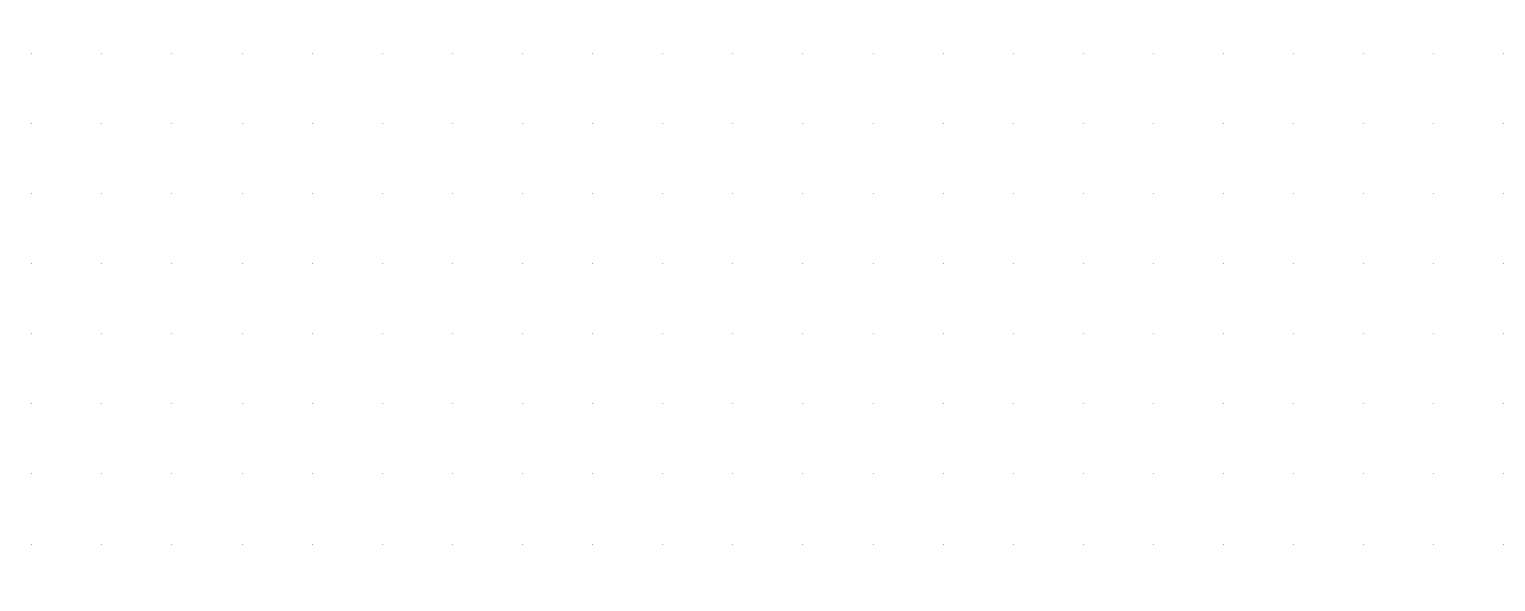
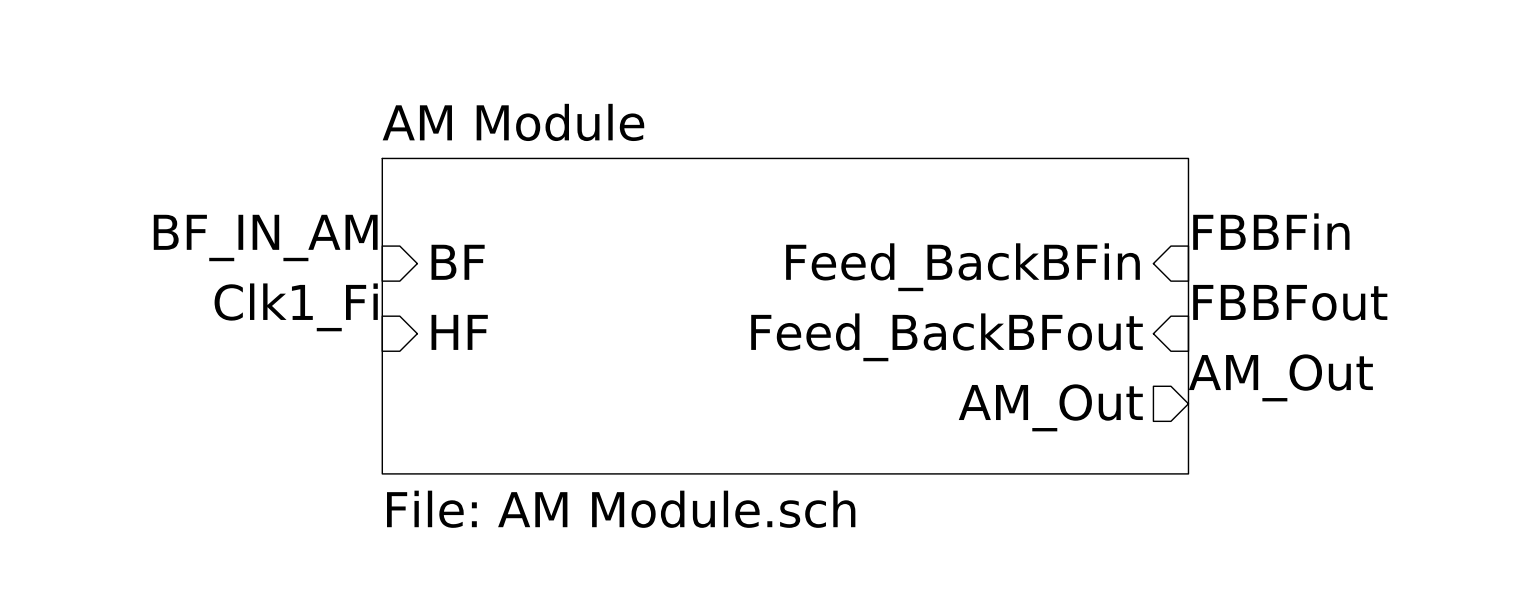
label: none -> FBBFin (1271, 231)
label: none -> BF_IN_AM (265, 237)
sheet pin: none -> BF (458, 262)
sheet pin: none -> Feed_BackBFin (963, 267)
label: none -> FBBFout (1290, 302)
label: none -> Clk1_Fi (296, 307)
sheet AM Module: none -> File: AM Module.sch (785, 316)
sheet pin: none -> HF (459, 332)
sheet pin: none -> Feed_BackBFout (947, 337)
label: none -> AM_Out (1280, 377)
hierarchical label: none -> AM_Out (1050, 407)

